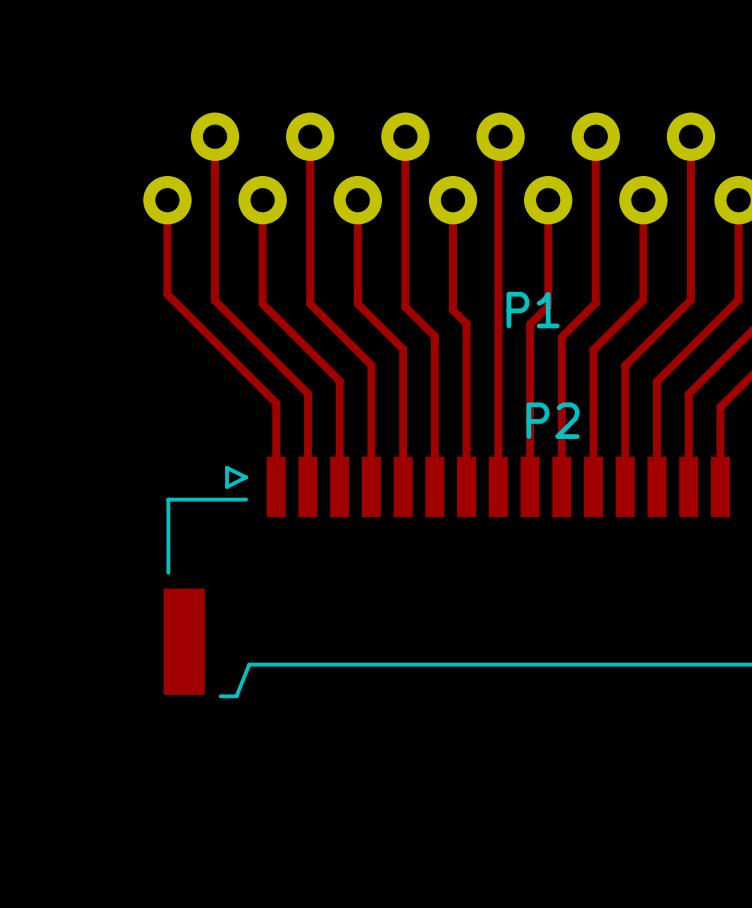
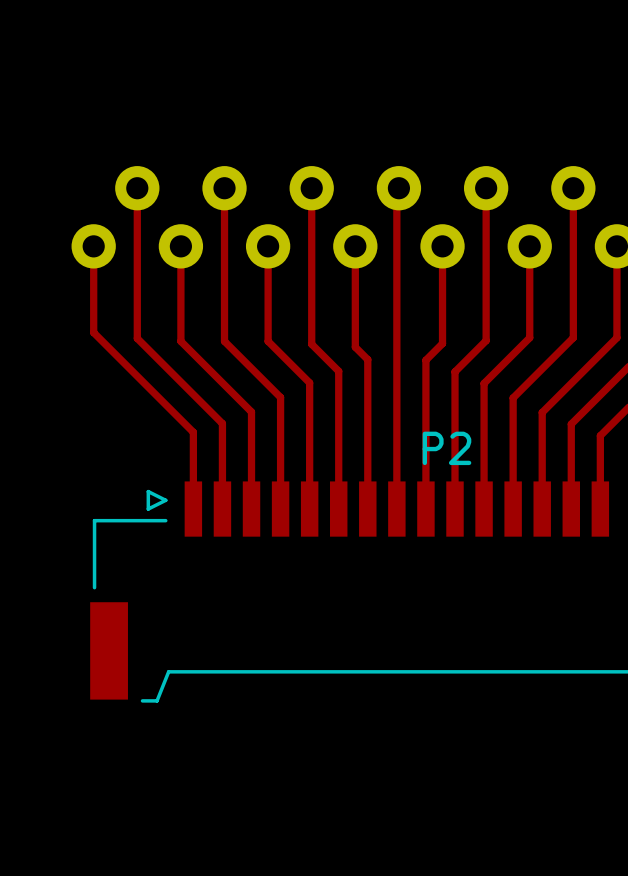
P1 name: P1 (533, 310) -> none

